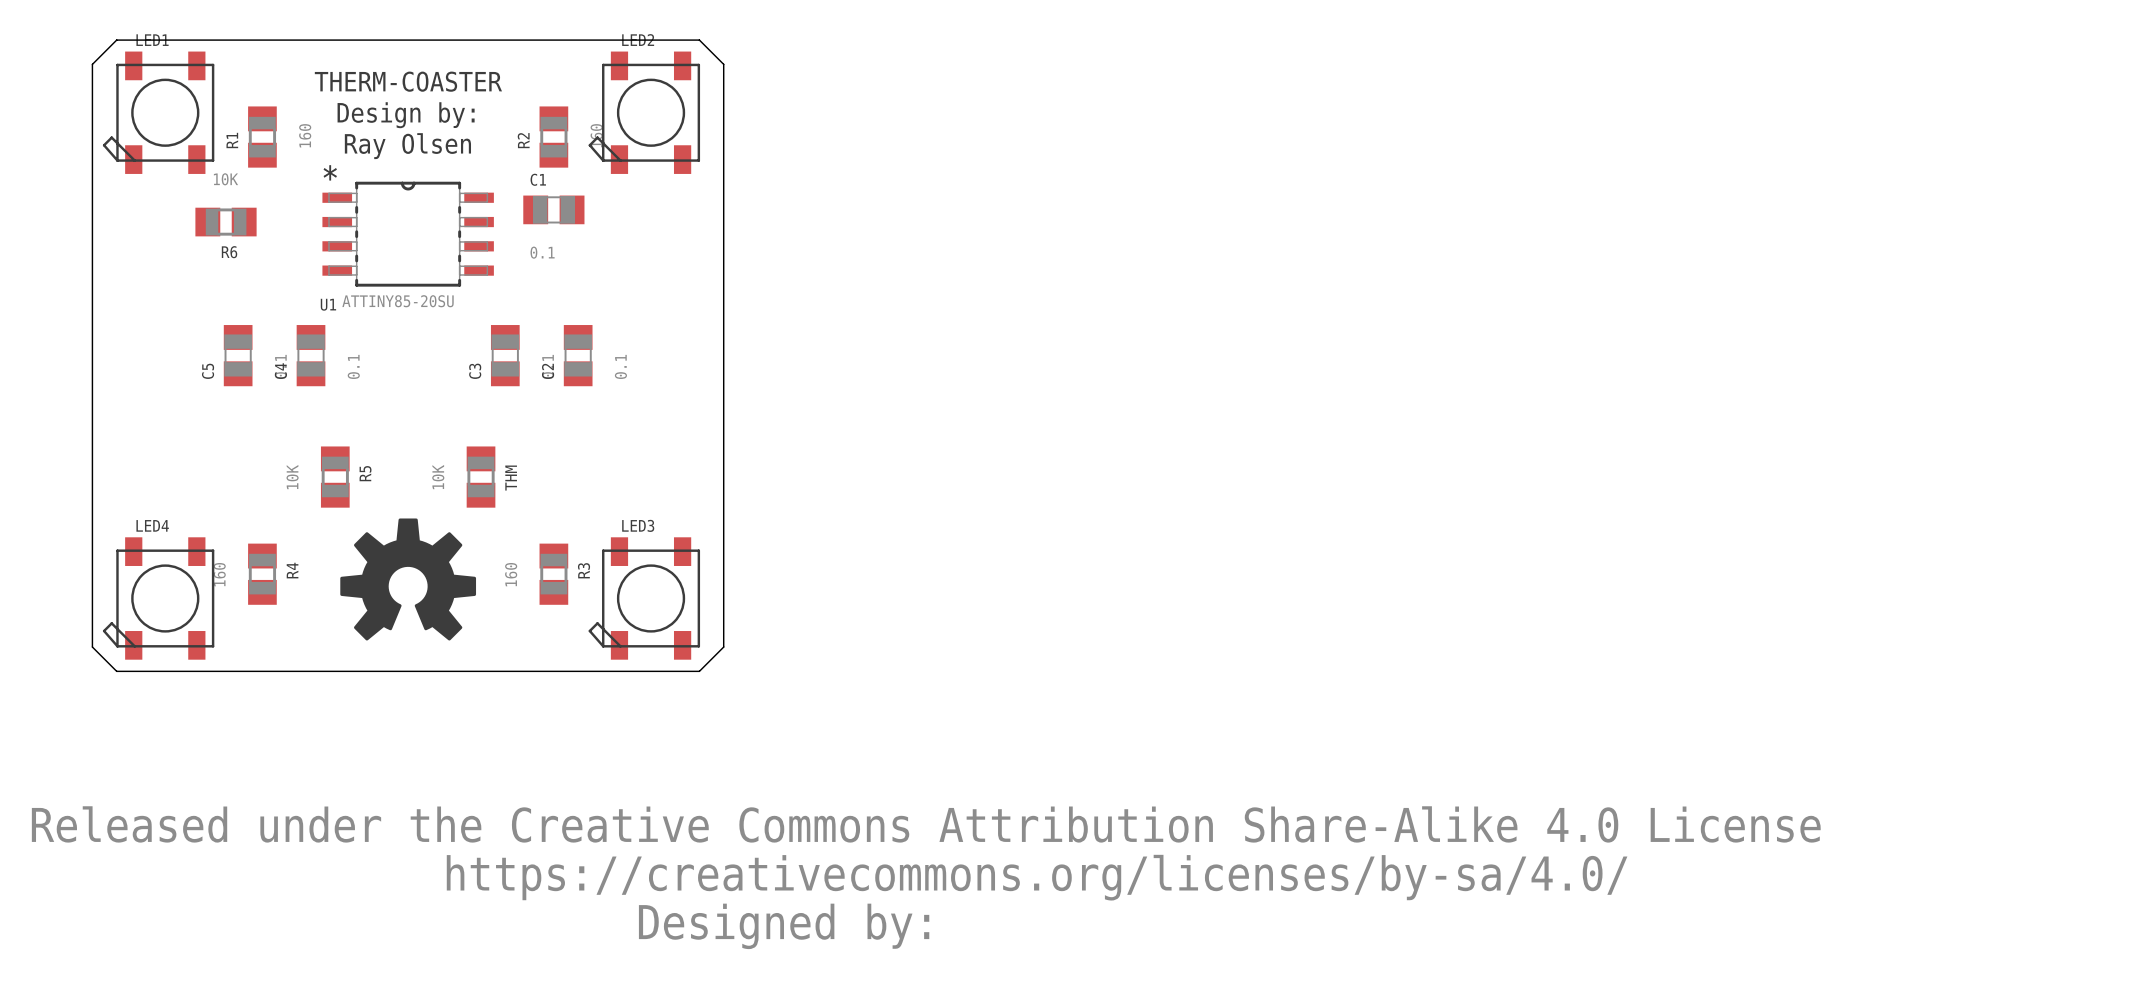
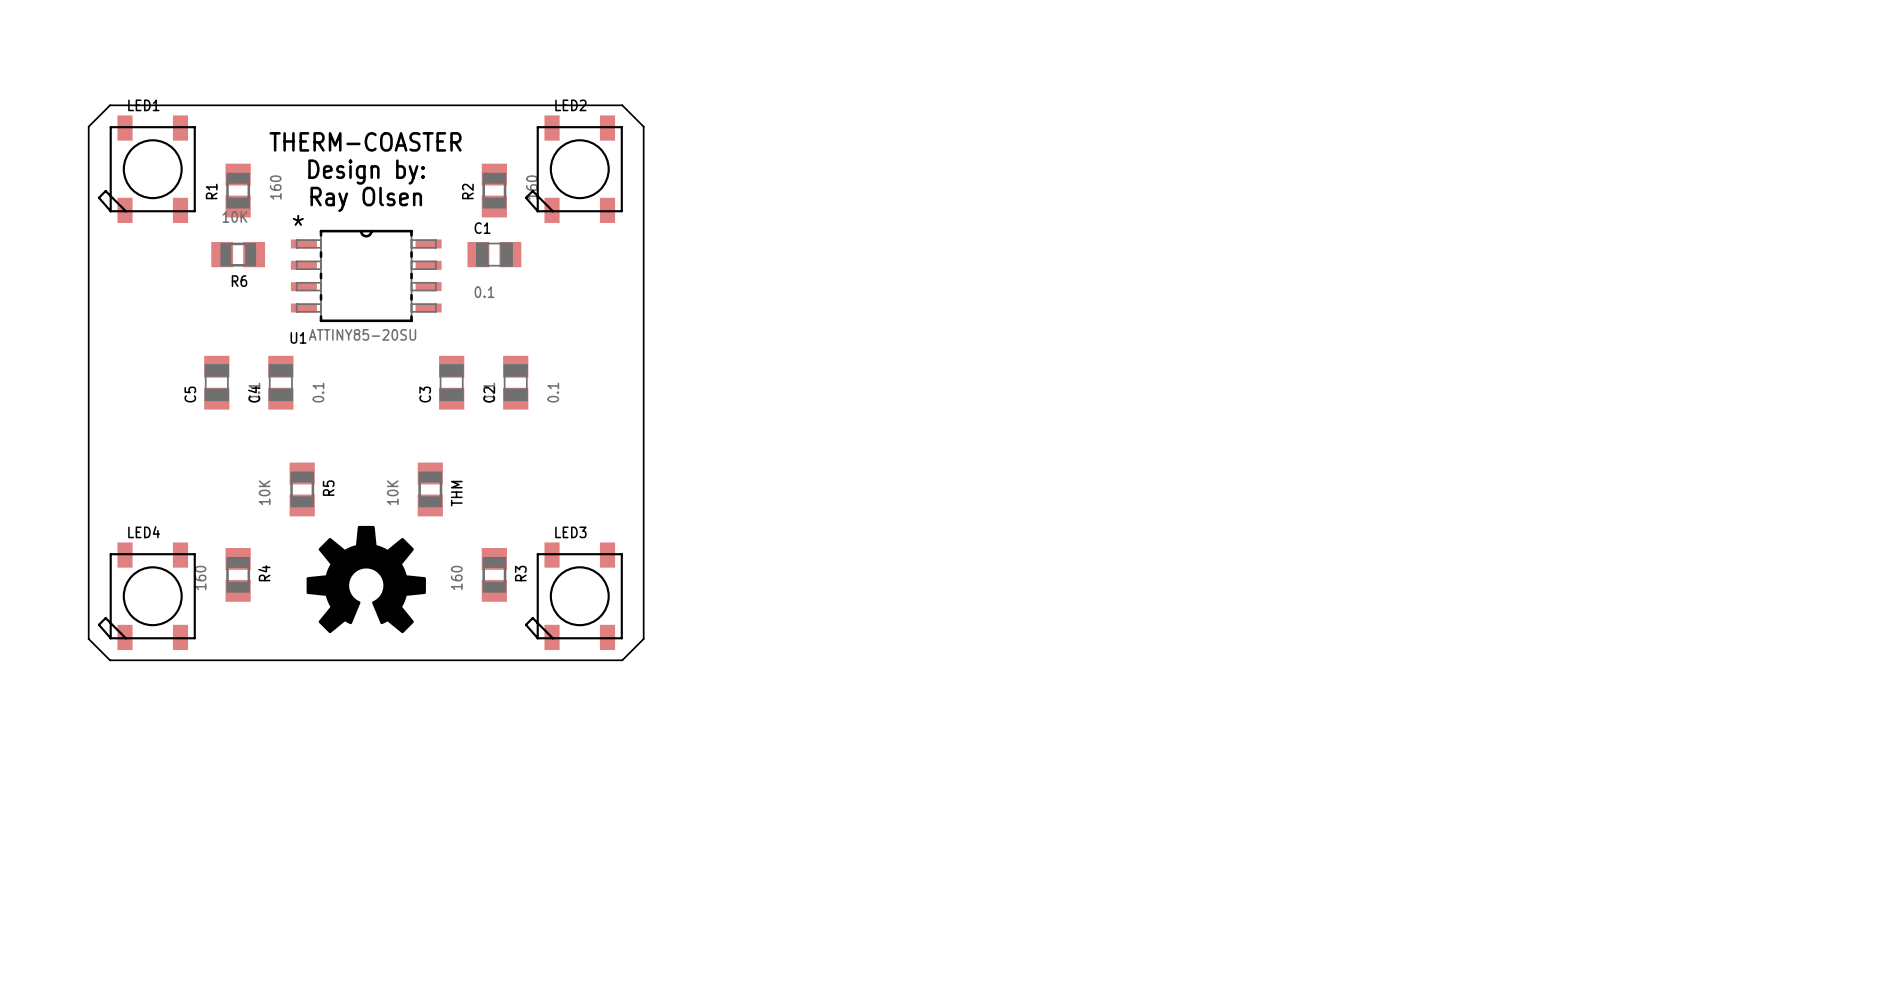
R6 position: (226, 222) -> (238, 254)
drawing: [31, 806, 1821, 950] -> none

